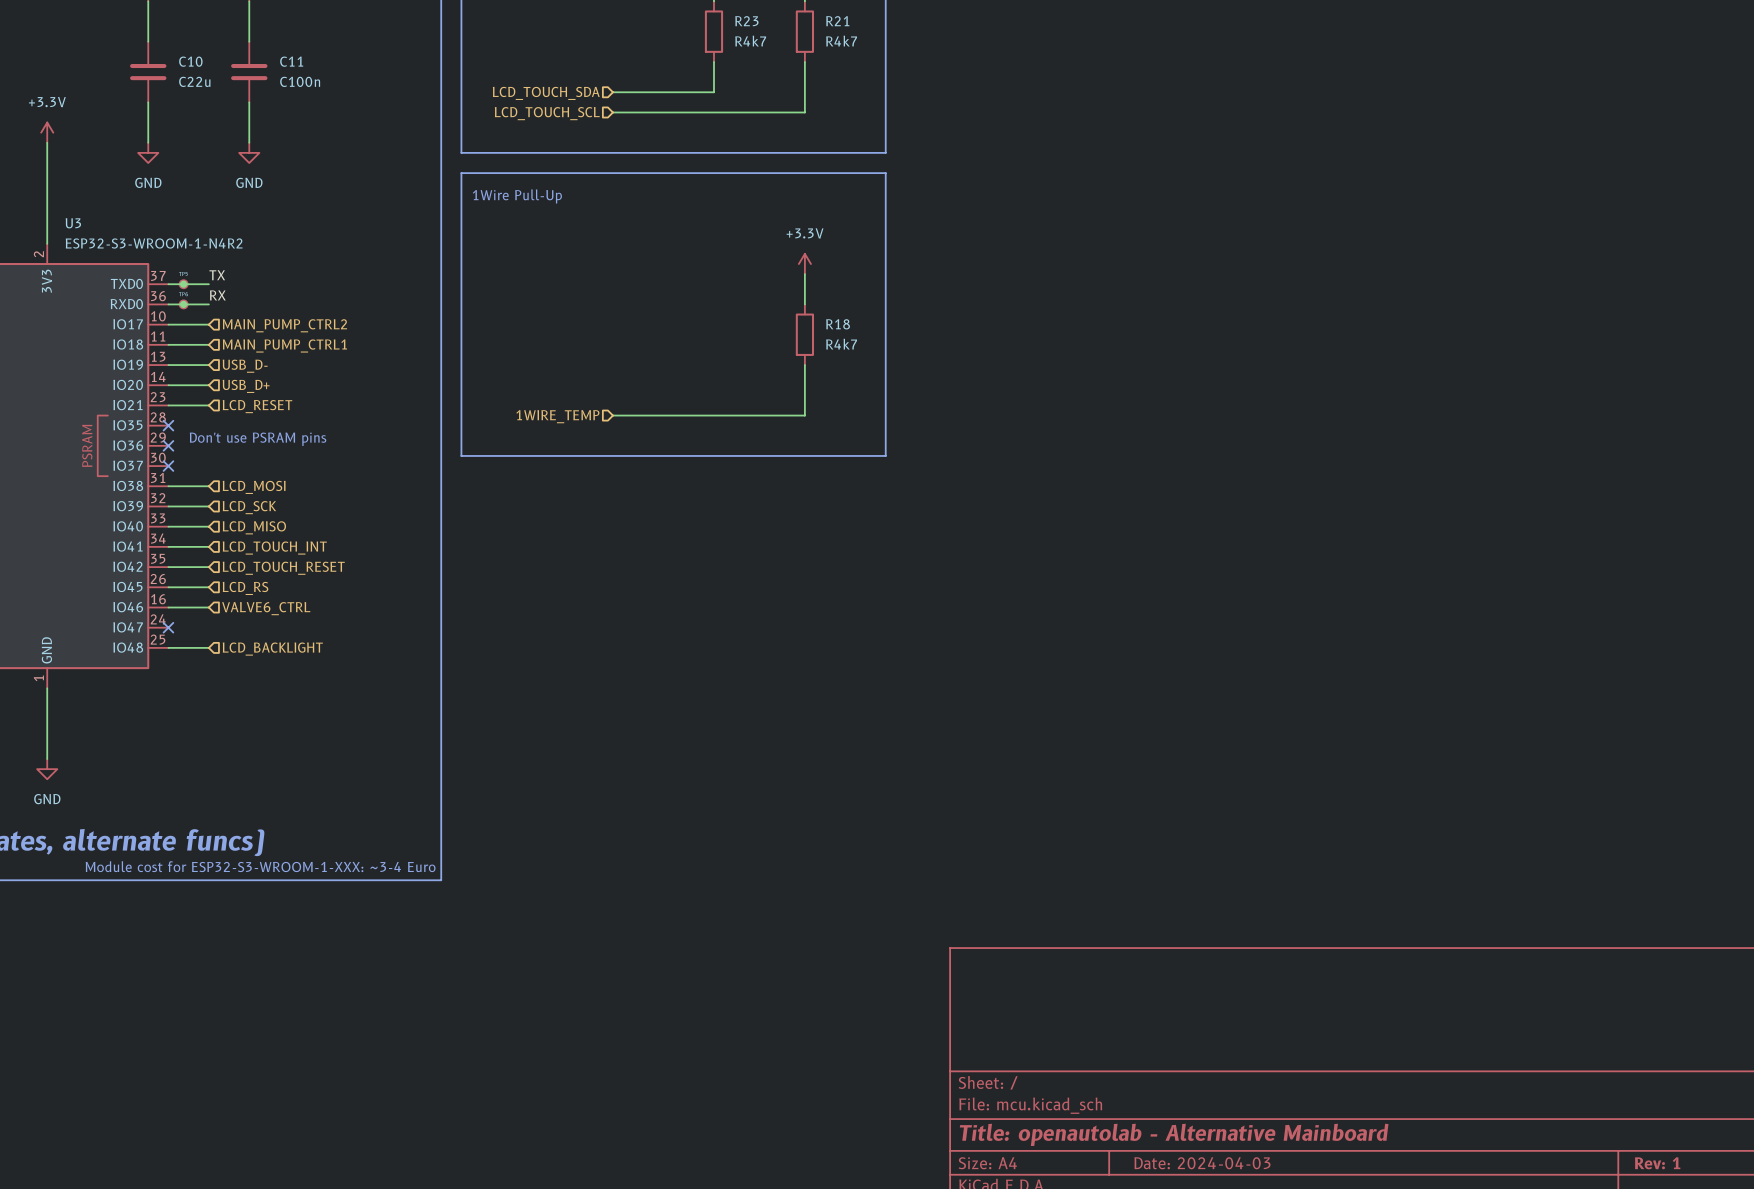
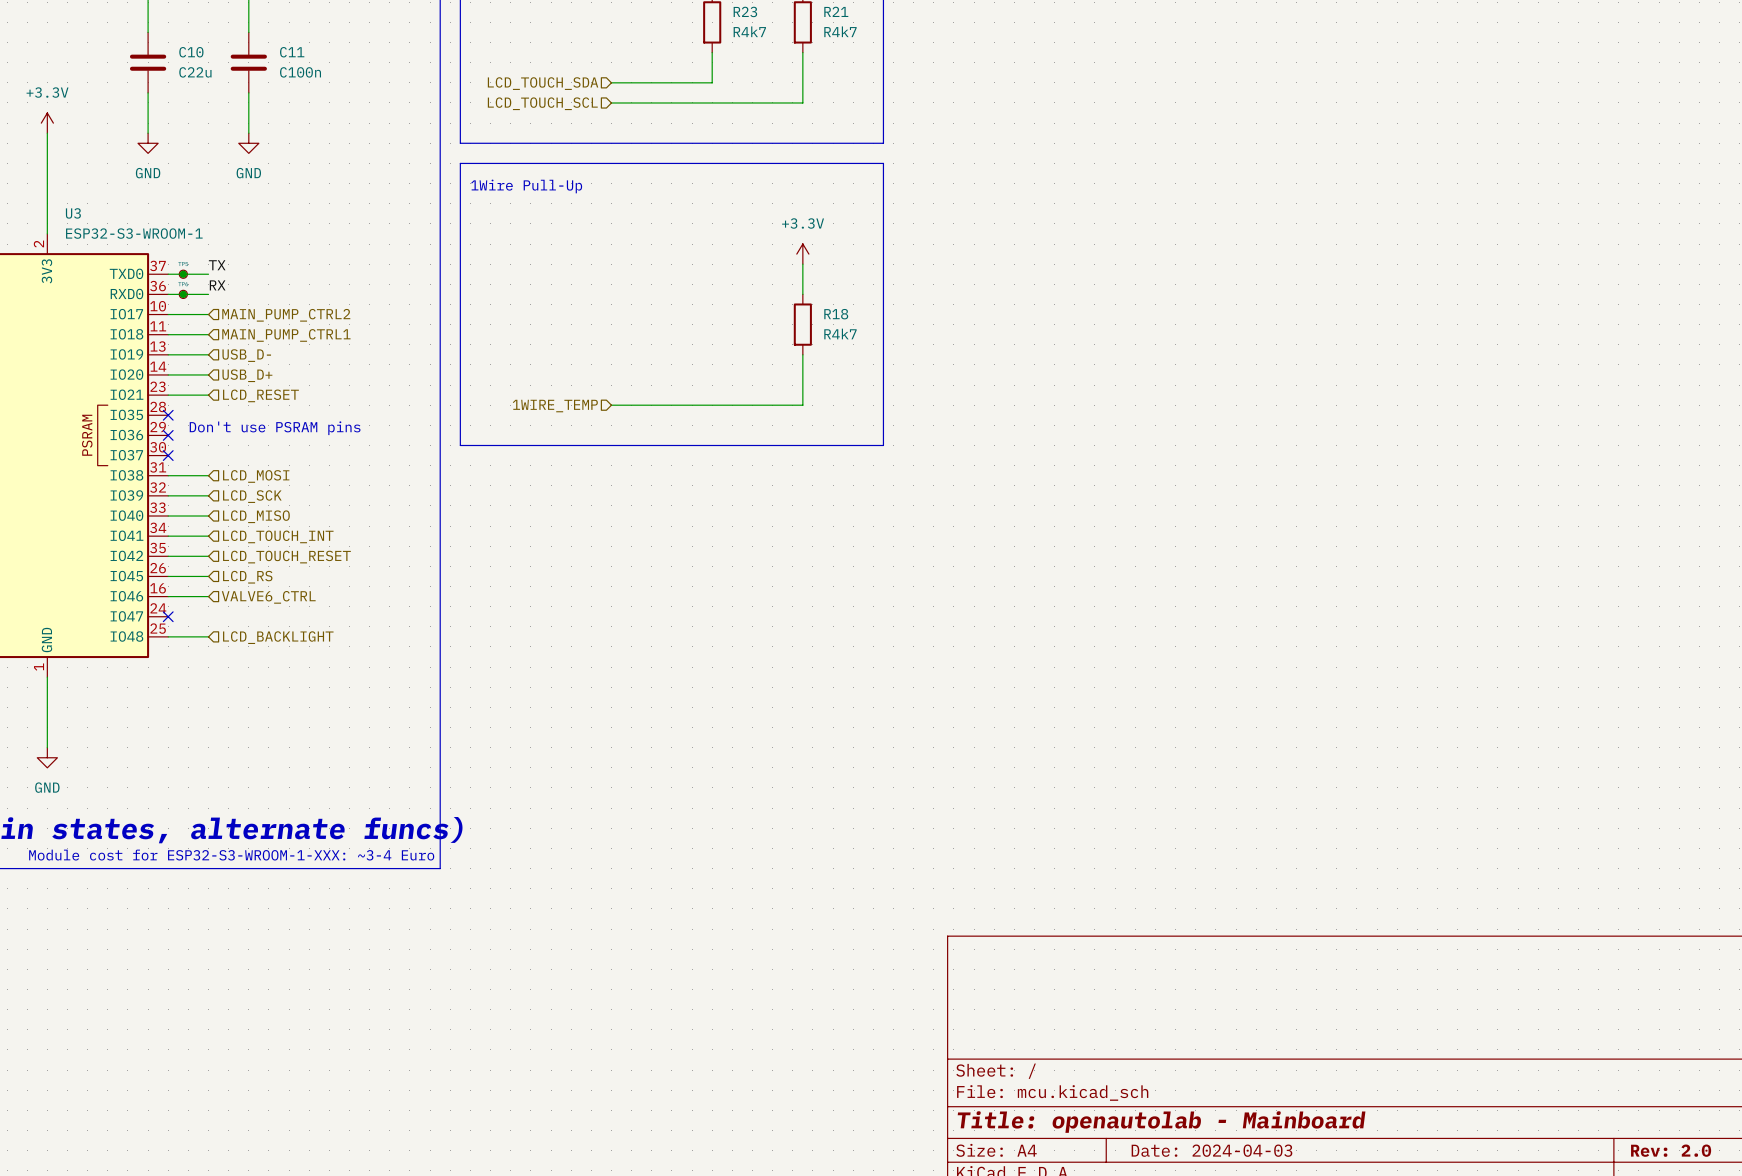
U3 value: ESP32-S3-WROOM-1-N4R2 (154, 243) -> ESP32-S3-WROOM-1 (134, 233)
title block: Title: openautolab - Alternative Mainboard (1174, 1134) -> Title: openautolab - Mainboard (1161, 1122)
title block: Rev: 1 (1657, 1163) -> Rev: 2.0 (1671, 1150)

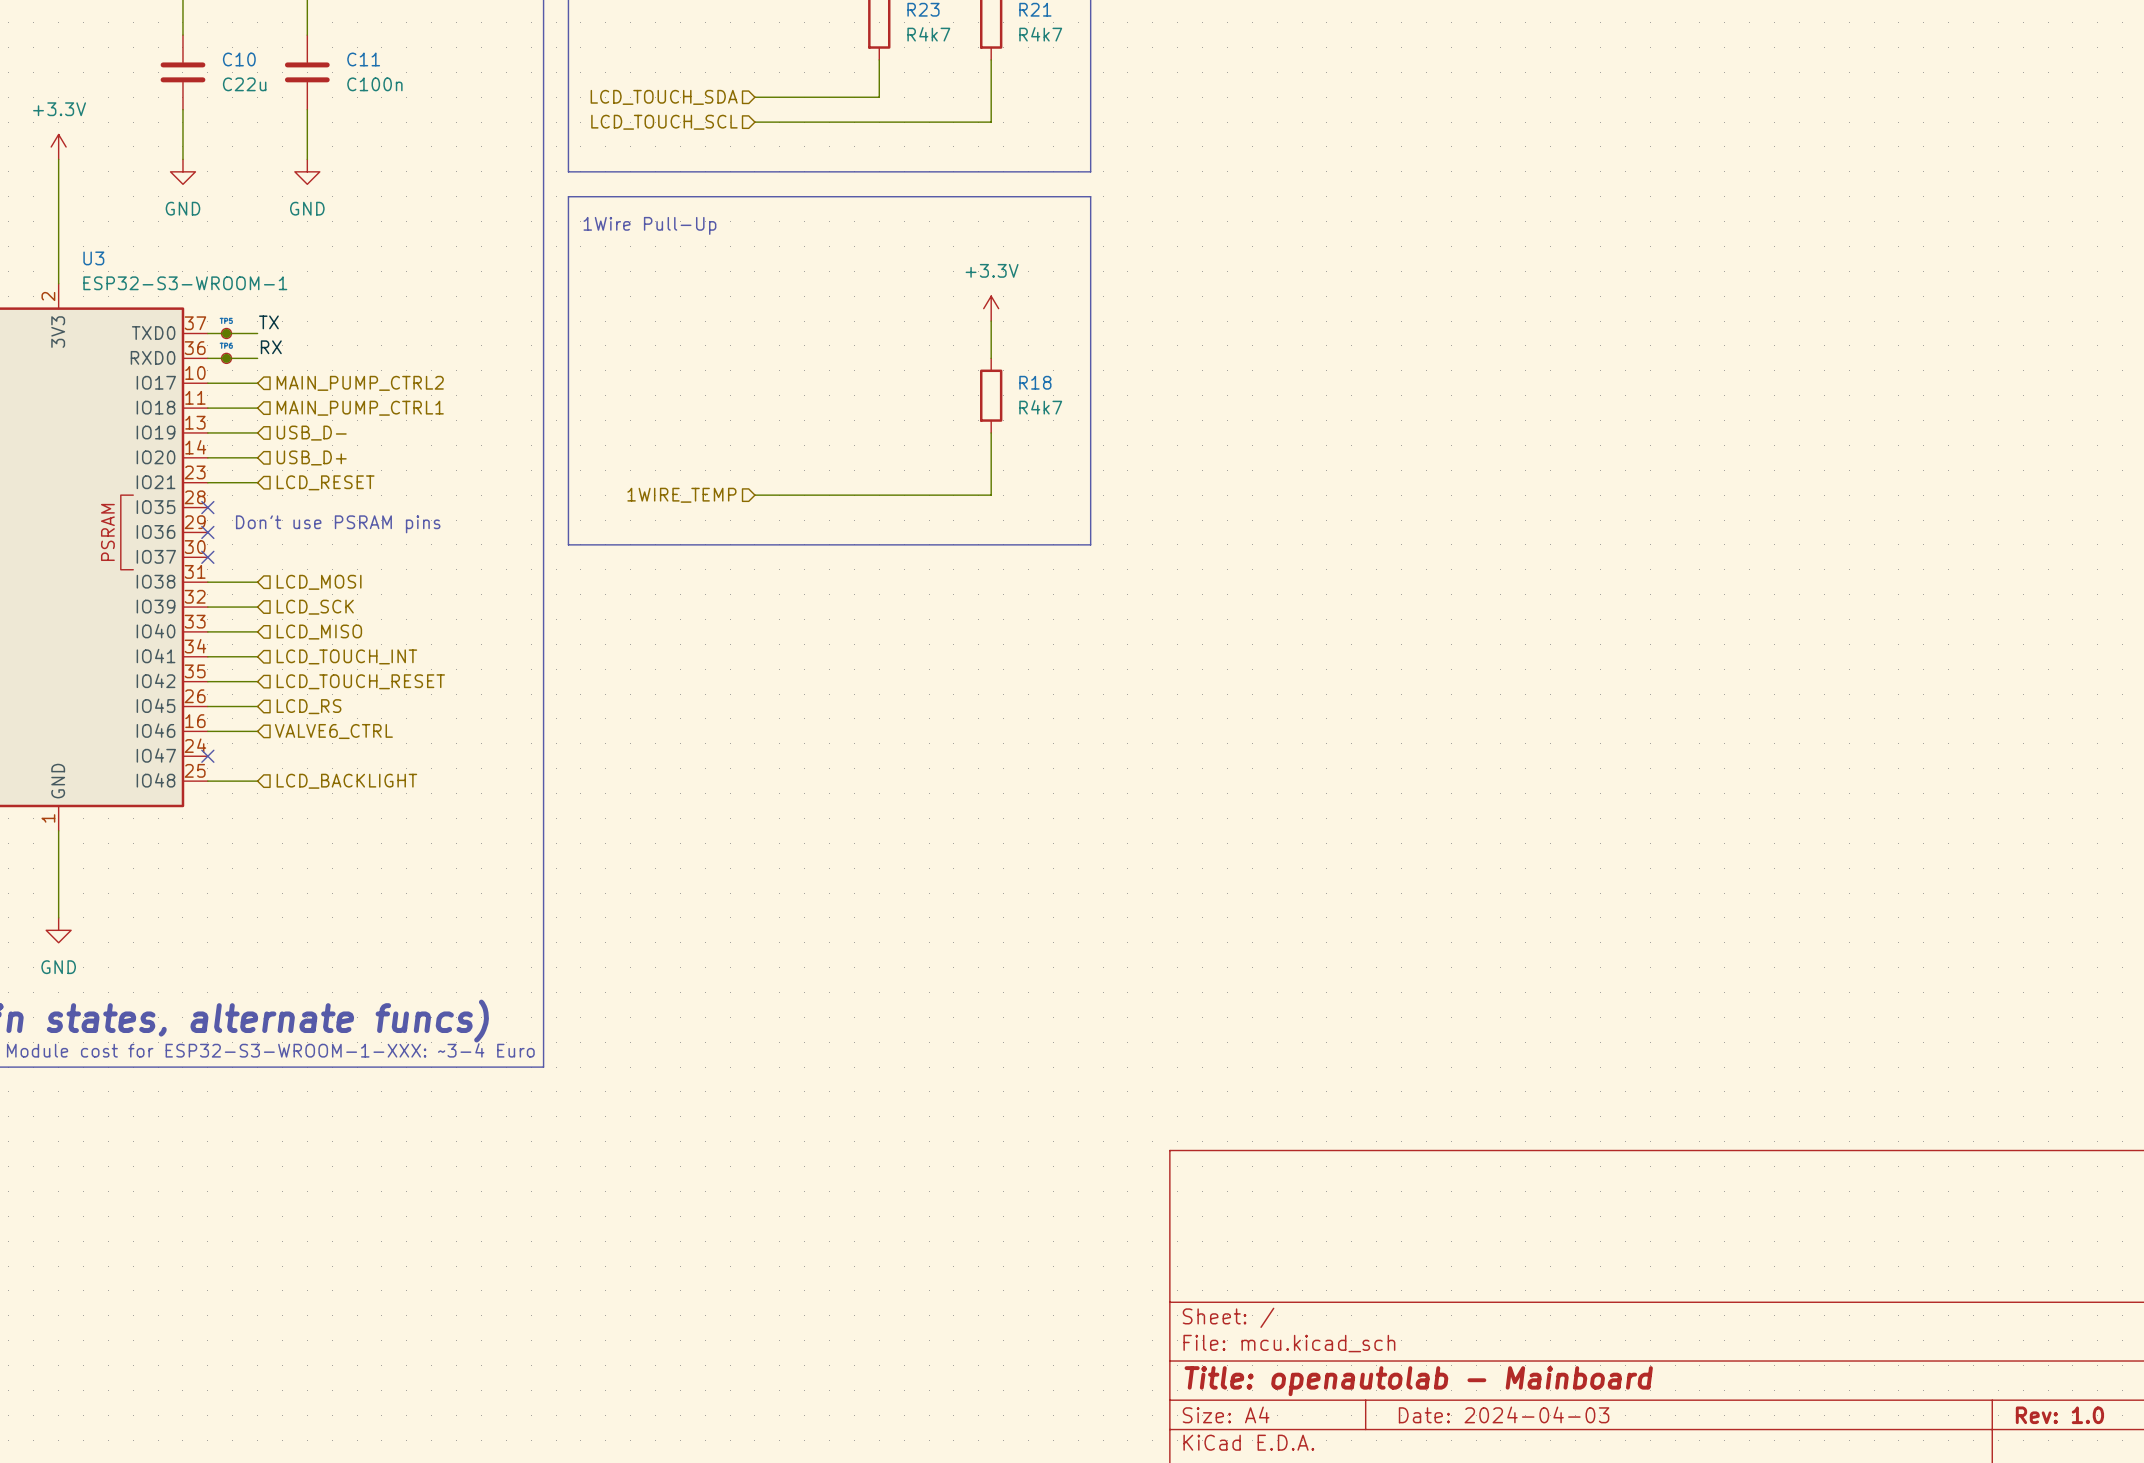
title block: Rev: 2.0 (1671, 1150) -> Rev: 1.0 (2059, 1415)

